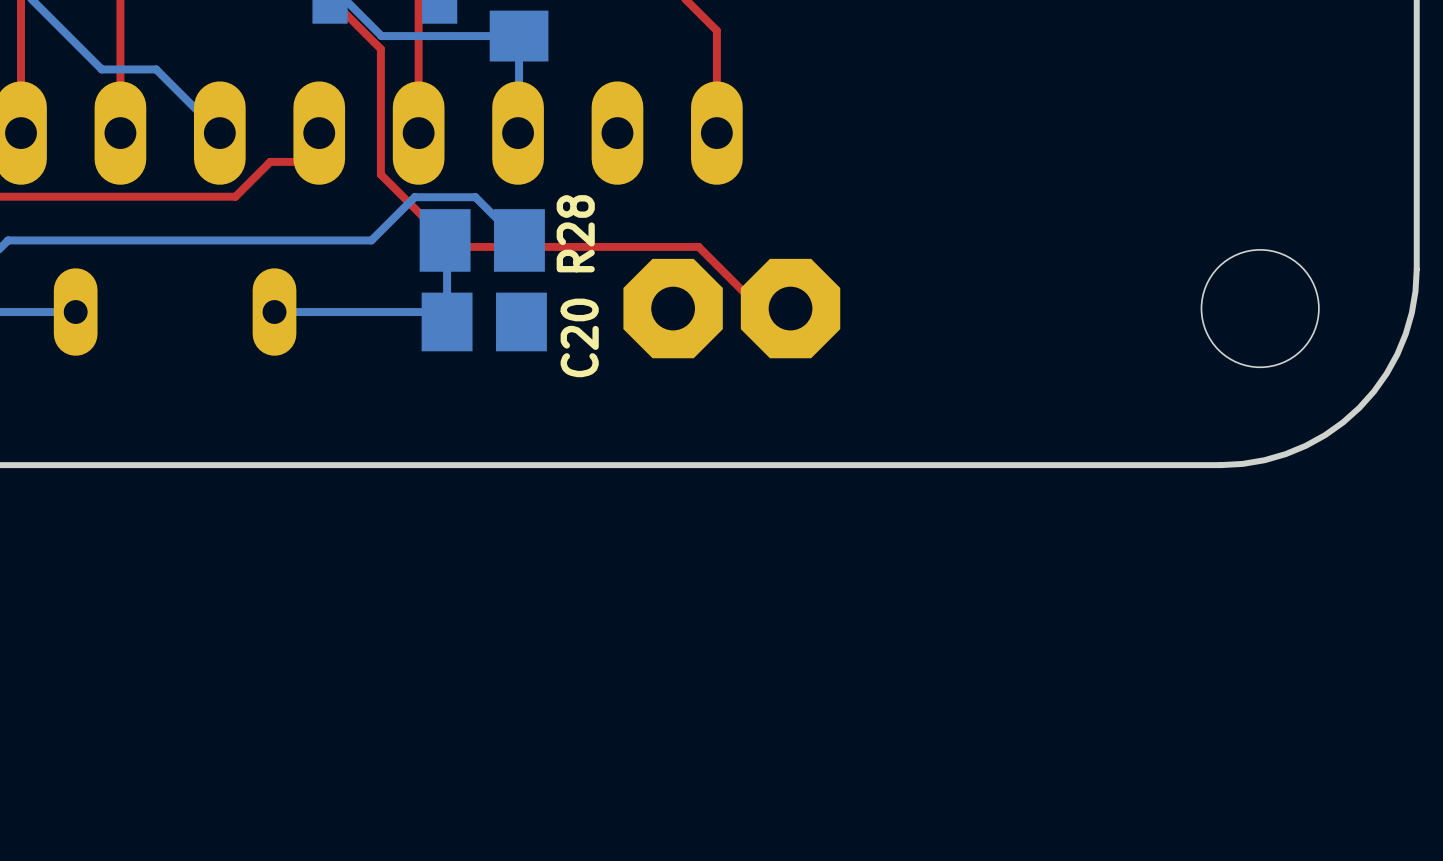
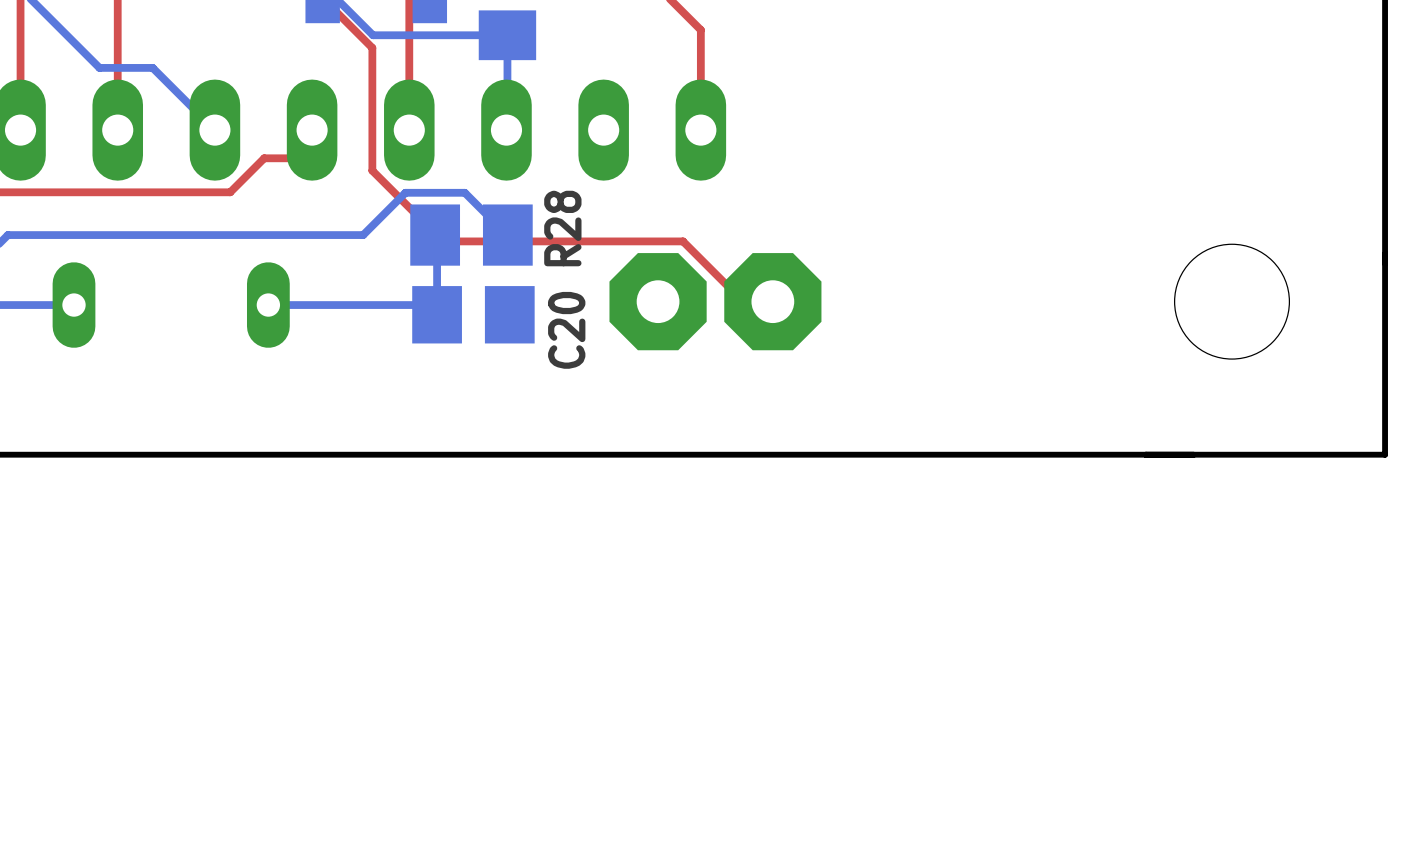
board edge: (1416, 269) (1415, 291) (1405, 334) (1386, 373) (1359, 407) (1325, 435) (1285, 454) (1242, 463) (1221, 465) -> (1385, 263) (1385, 454) (1193, 454)

